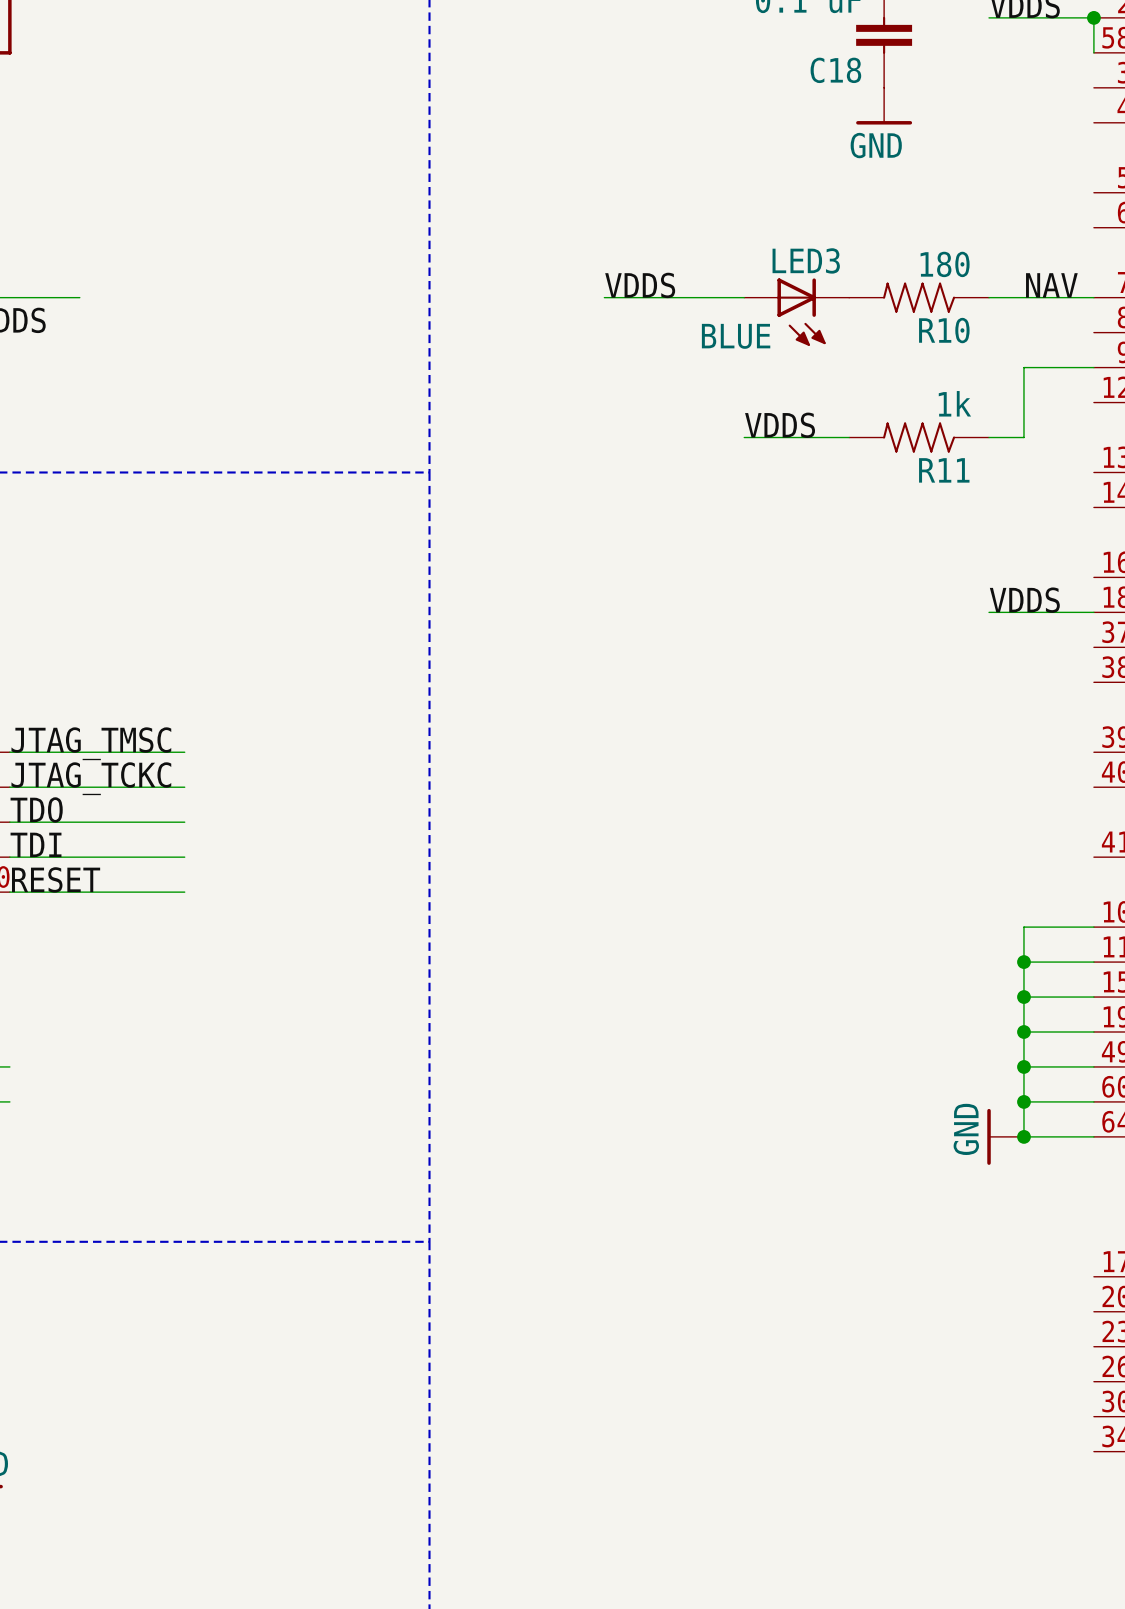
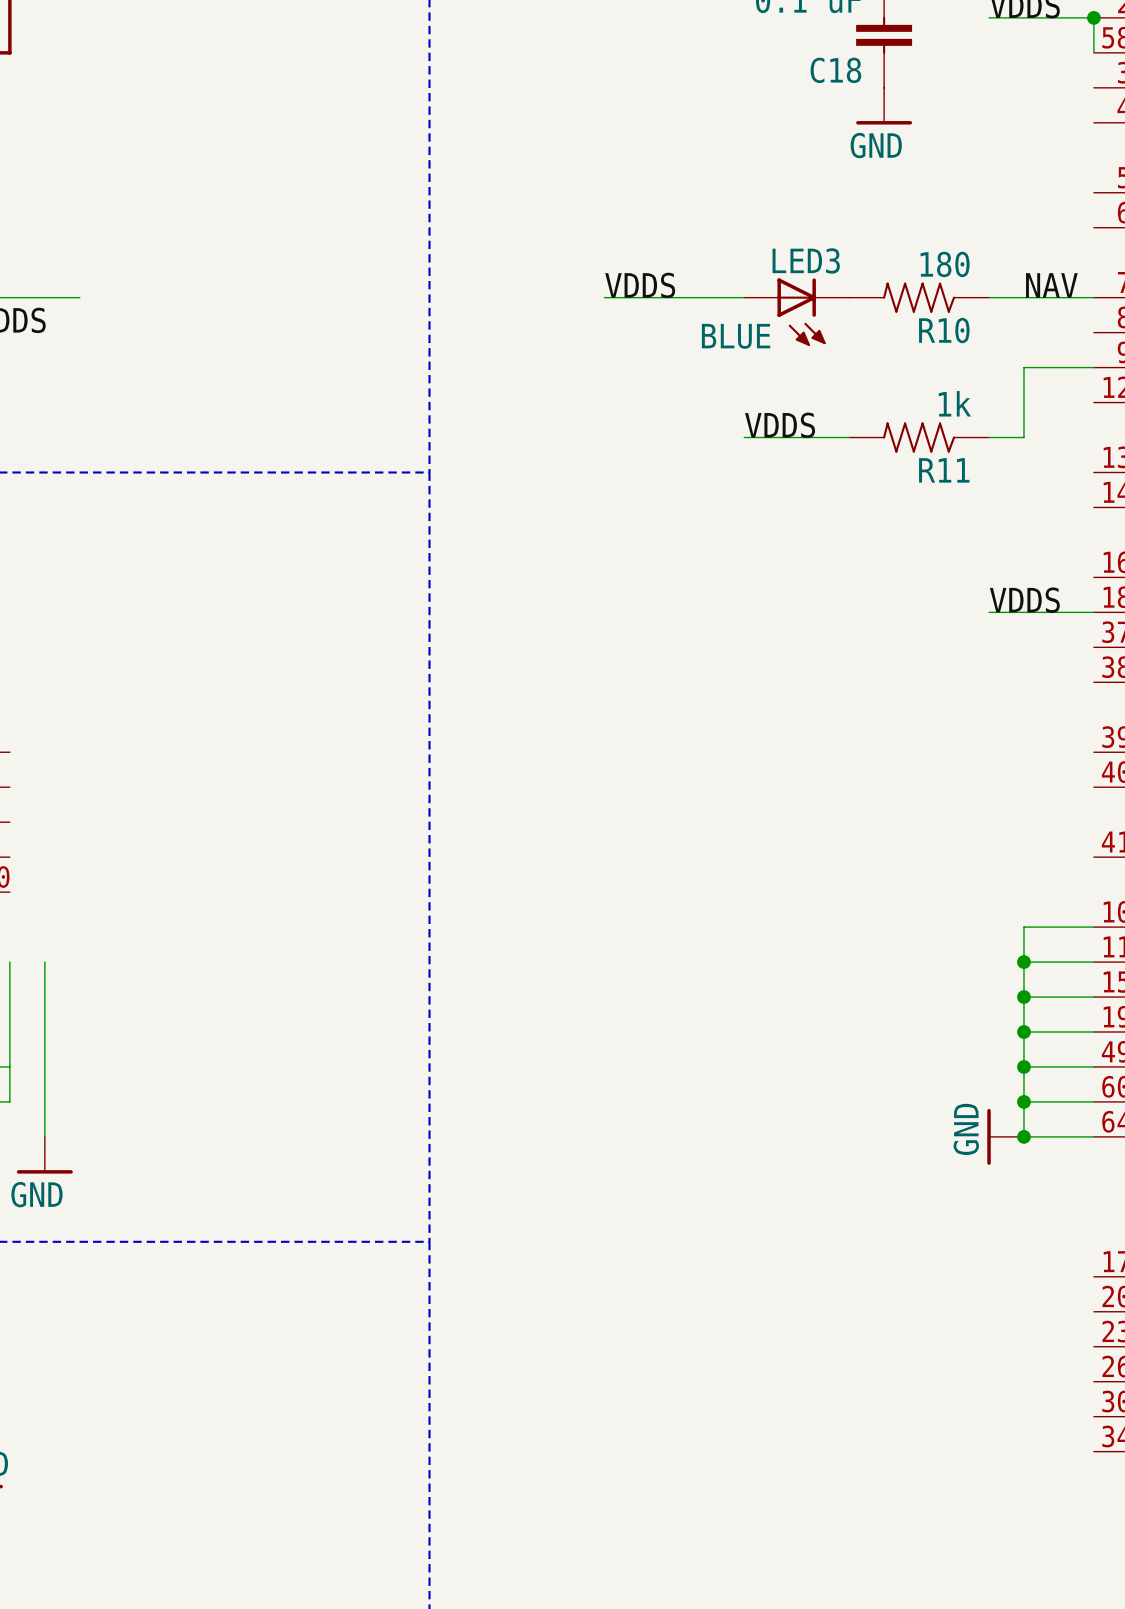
label: JTAG_TMSC (91, 743) -> none
wire: (9, 752) (184, 752) -> none
label: JTAG_TCKC (91, 778) -> none
wire: (9, 787) (184, 787) -> none
label: TDO (36, 809) -> none
wire: (9, 822) (184, 822) -> none
label: TDI (36, 844) -> none
wire: (9, 857) (184, 857) -> none
label: RESET (56, 879) -> none
wire: (9, 892) (184, 892) -> none
wire: none -> (9, 962) (9, 1101)
wire: none -> (44, 962) (44, 1136)
power symbol: none -> GND (44, 1155)

